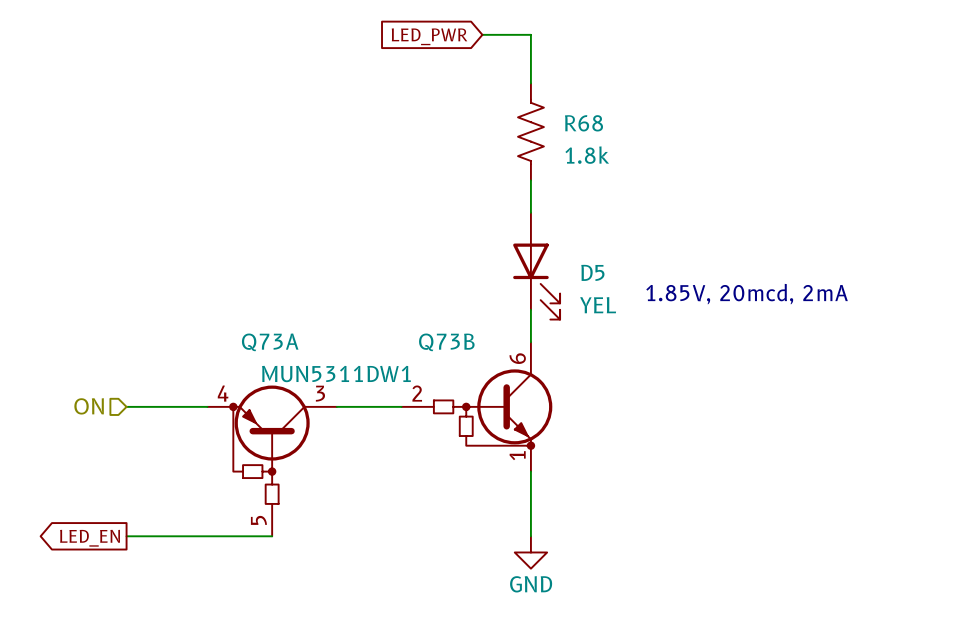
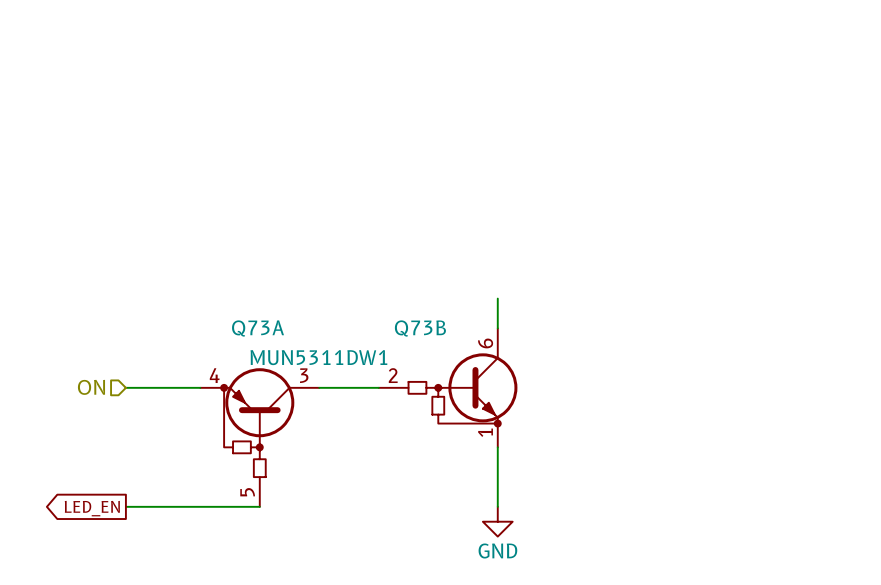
wire: (482, 34) (530, 34) (530, 83) -> none
global label: LED_PWR (429, 36) -> none
R68: 1.8k (530, 131) -> none
wire: (530, 180) (530, 212) -> none
D5: YEL (536, 266) -> none
text: 1.85V, 20mcd, 2mA (747, 294) -> none

